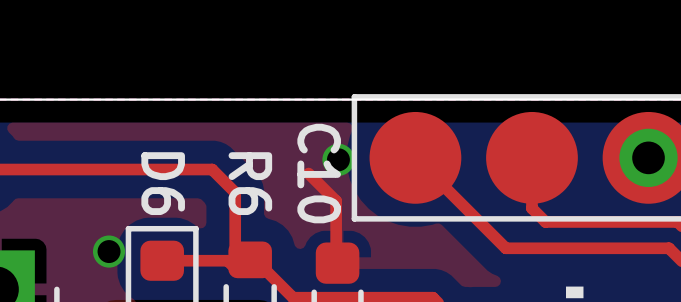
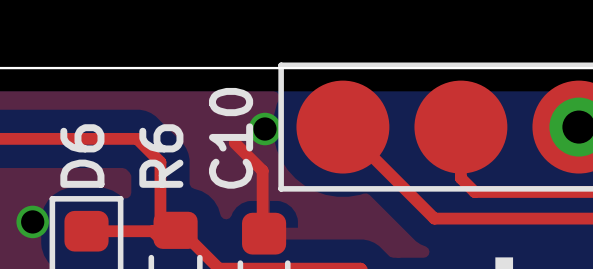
C10 name rotation: 0° (319, 173) -> 180° (231, 138)
D6 name rotation: 0° (163, 183) -> 180° (82, 156)
R6 name rotation: 0° (250, 183) -> 180° (161, 156)

